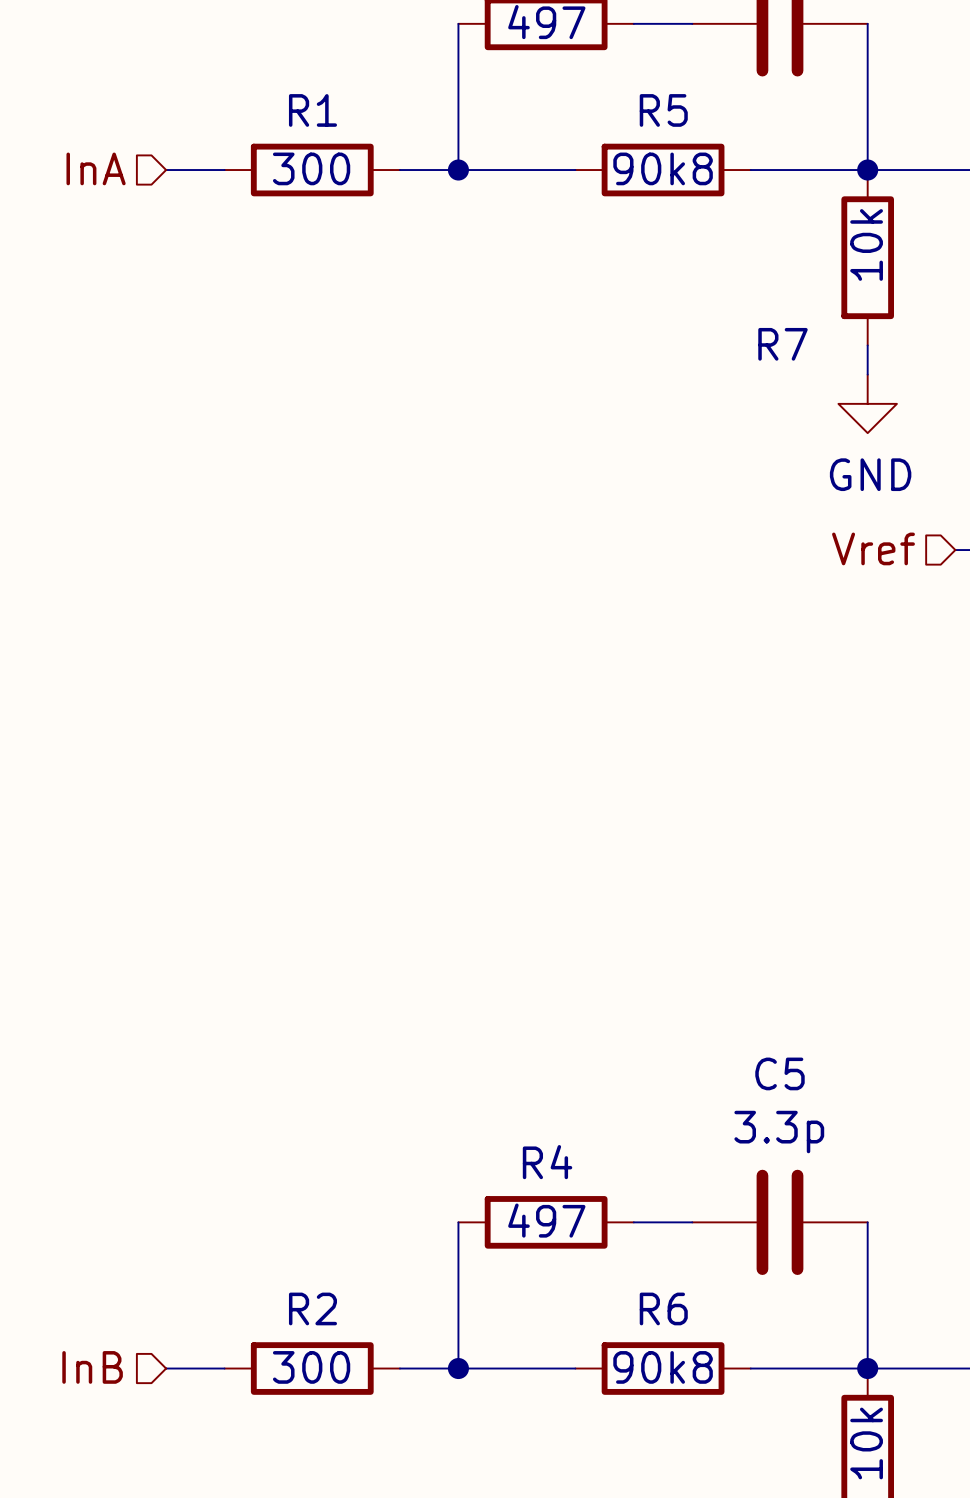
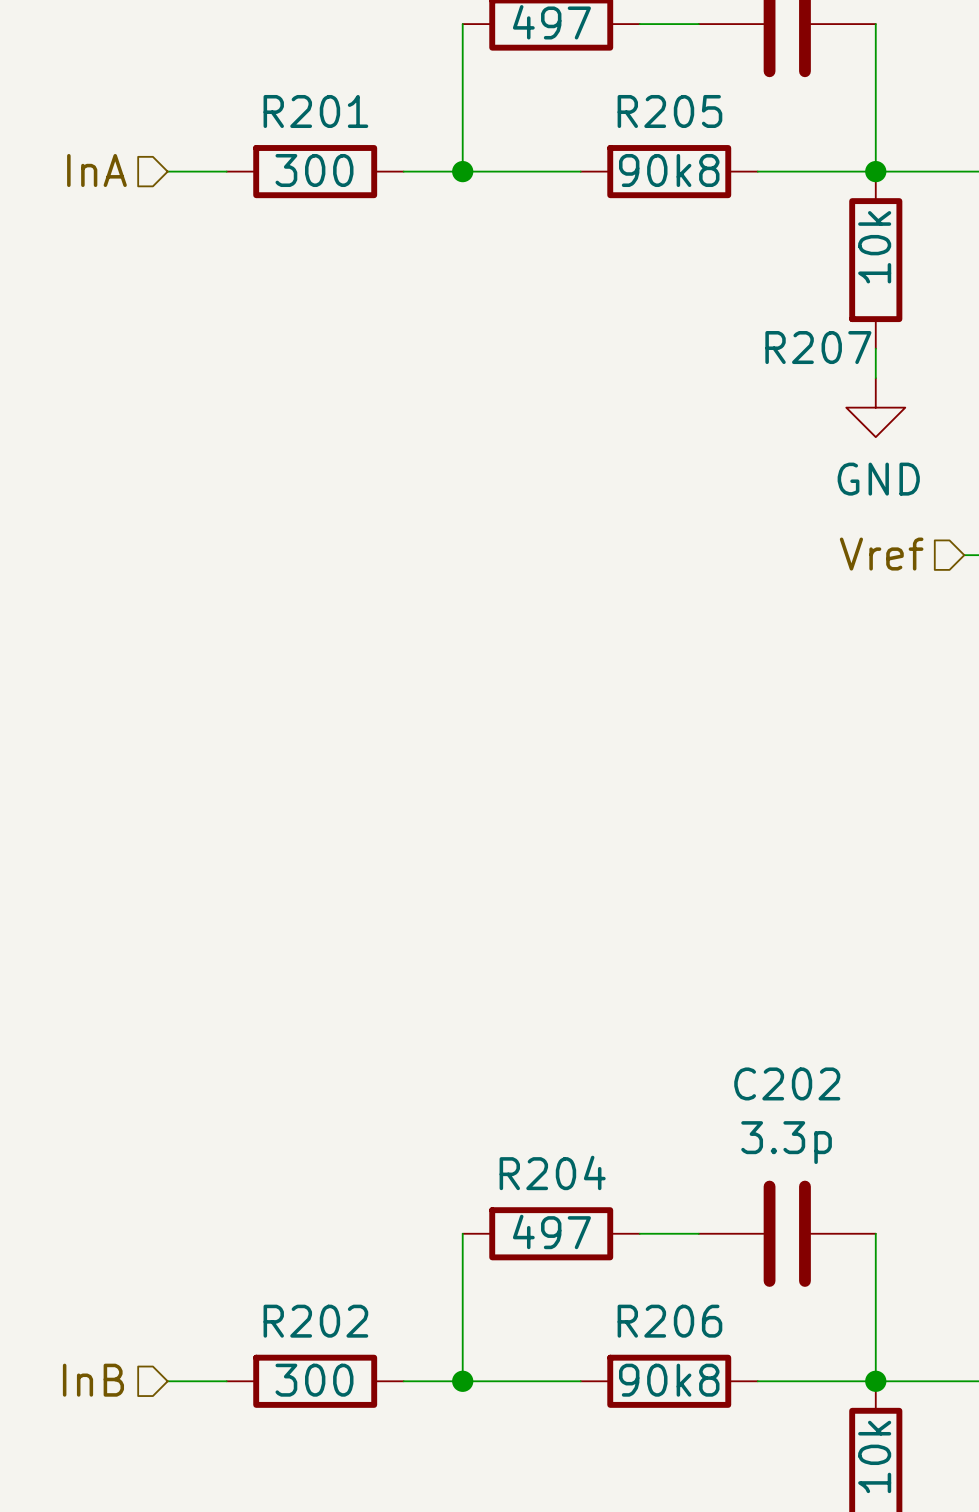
R1 name: R1 (312, 110) -> R201 (315, 111)
R5 name: R5 (663, 110) -> R205 (669, 111)
R7 name: R7 (782, 344) -> R207 (818, 347)
C5 name: C5 (779, 1073) -> C202 (787, 1083)
R4 name: R4 (547, 1162) -> R204 (552, 1172)
R2 name: R2 (312, 1308) -> R202 (315, 1321)
R6 name: R6 (663, 1308) -> R206 (669, 1321)

